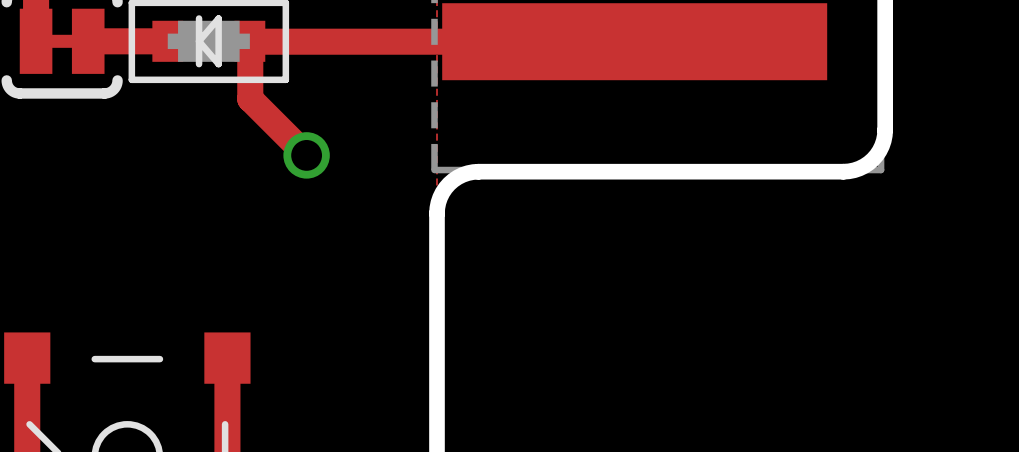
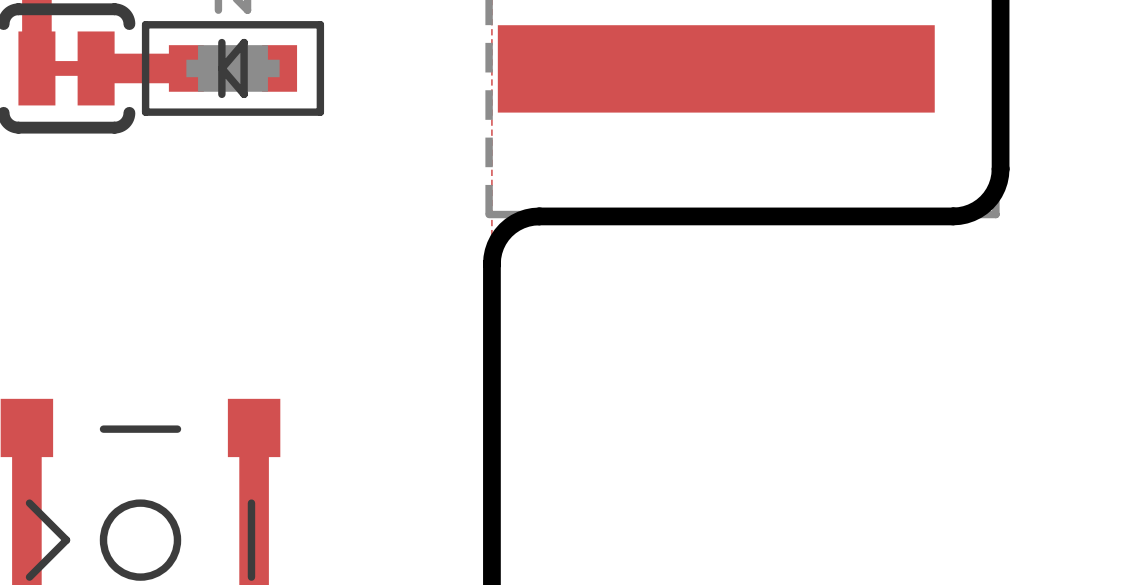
track: (634, 41) (250, 41) (250, 99) (306, 155) -> none
via: (306, 155) -> none

